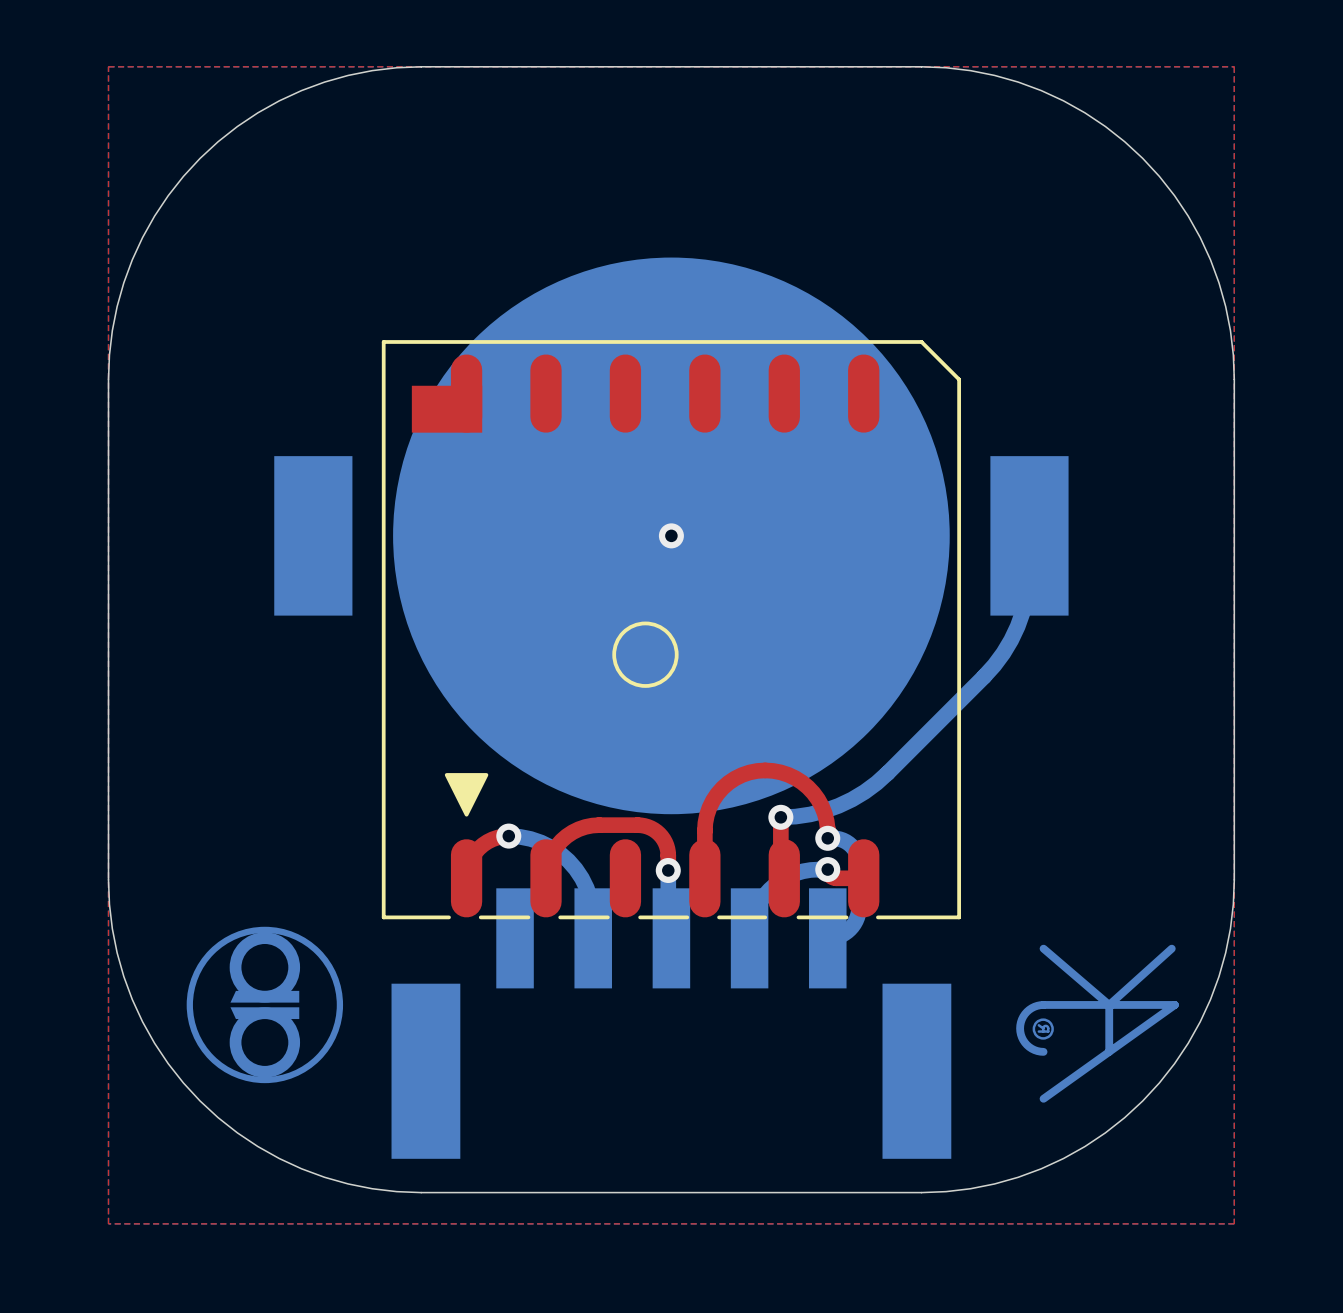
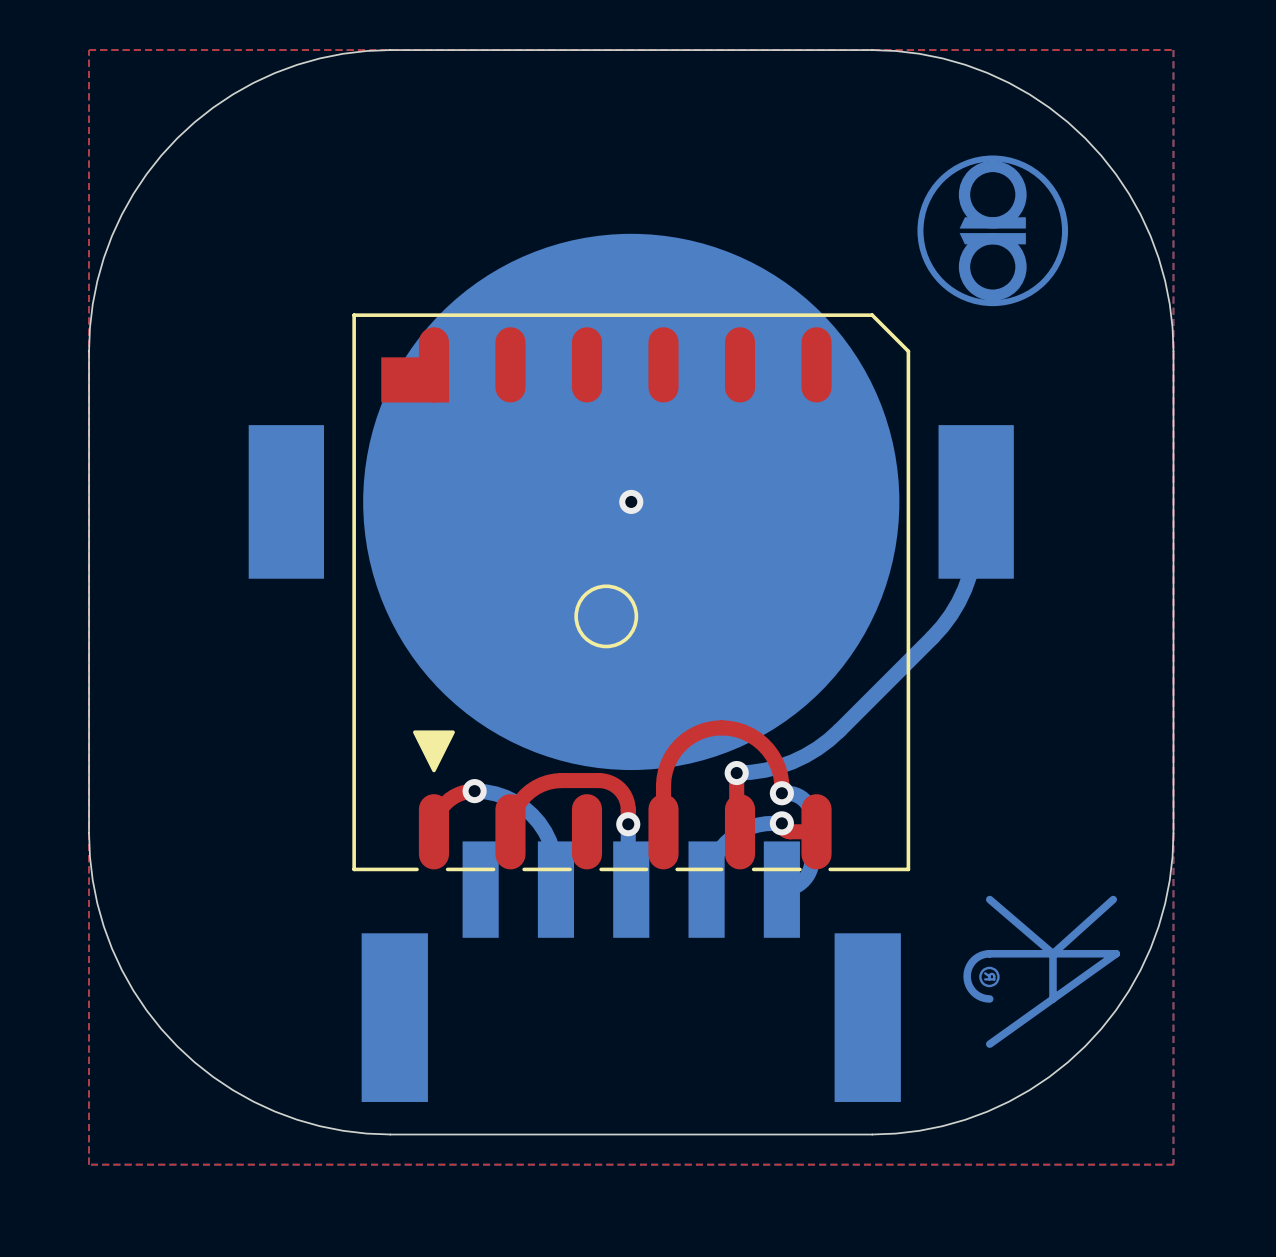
drawing: none -> [917, 155, 1069, 307]
drawing: [186, 926, 344, 1084] -> none

